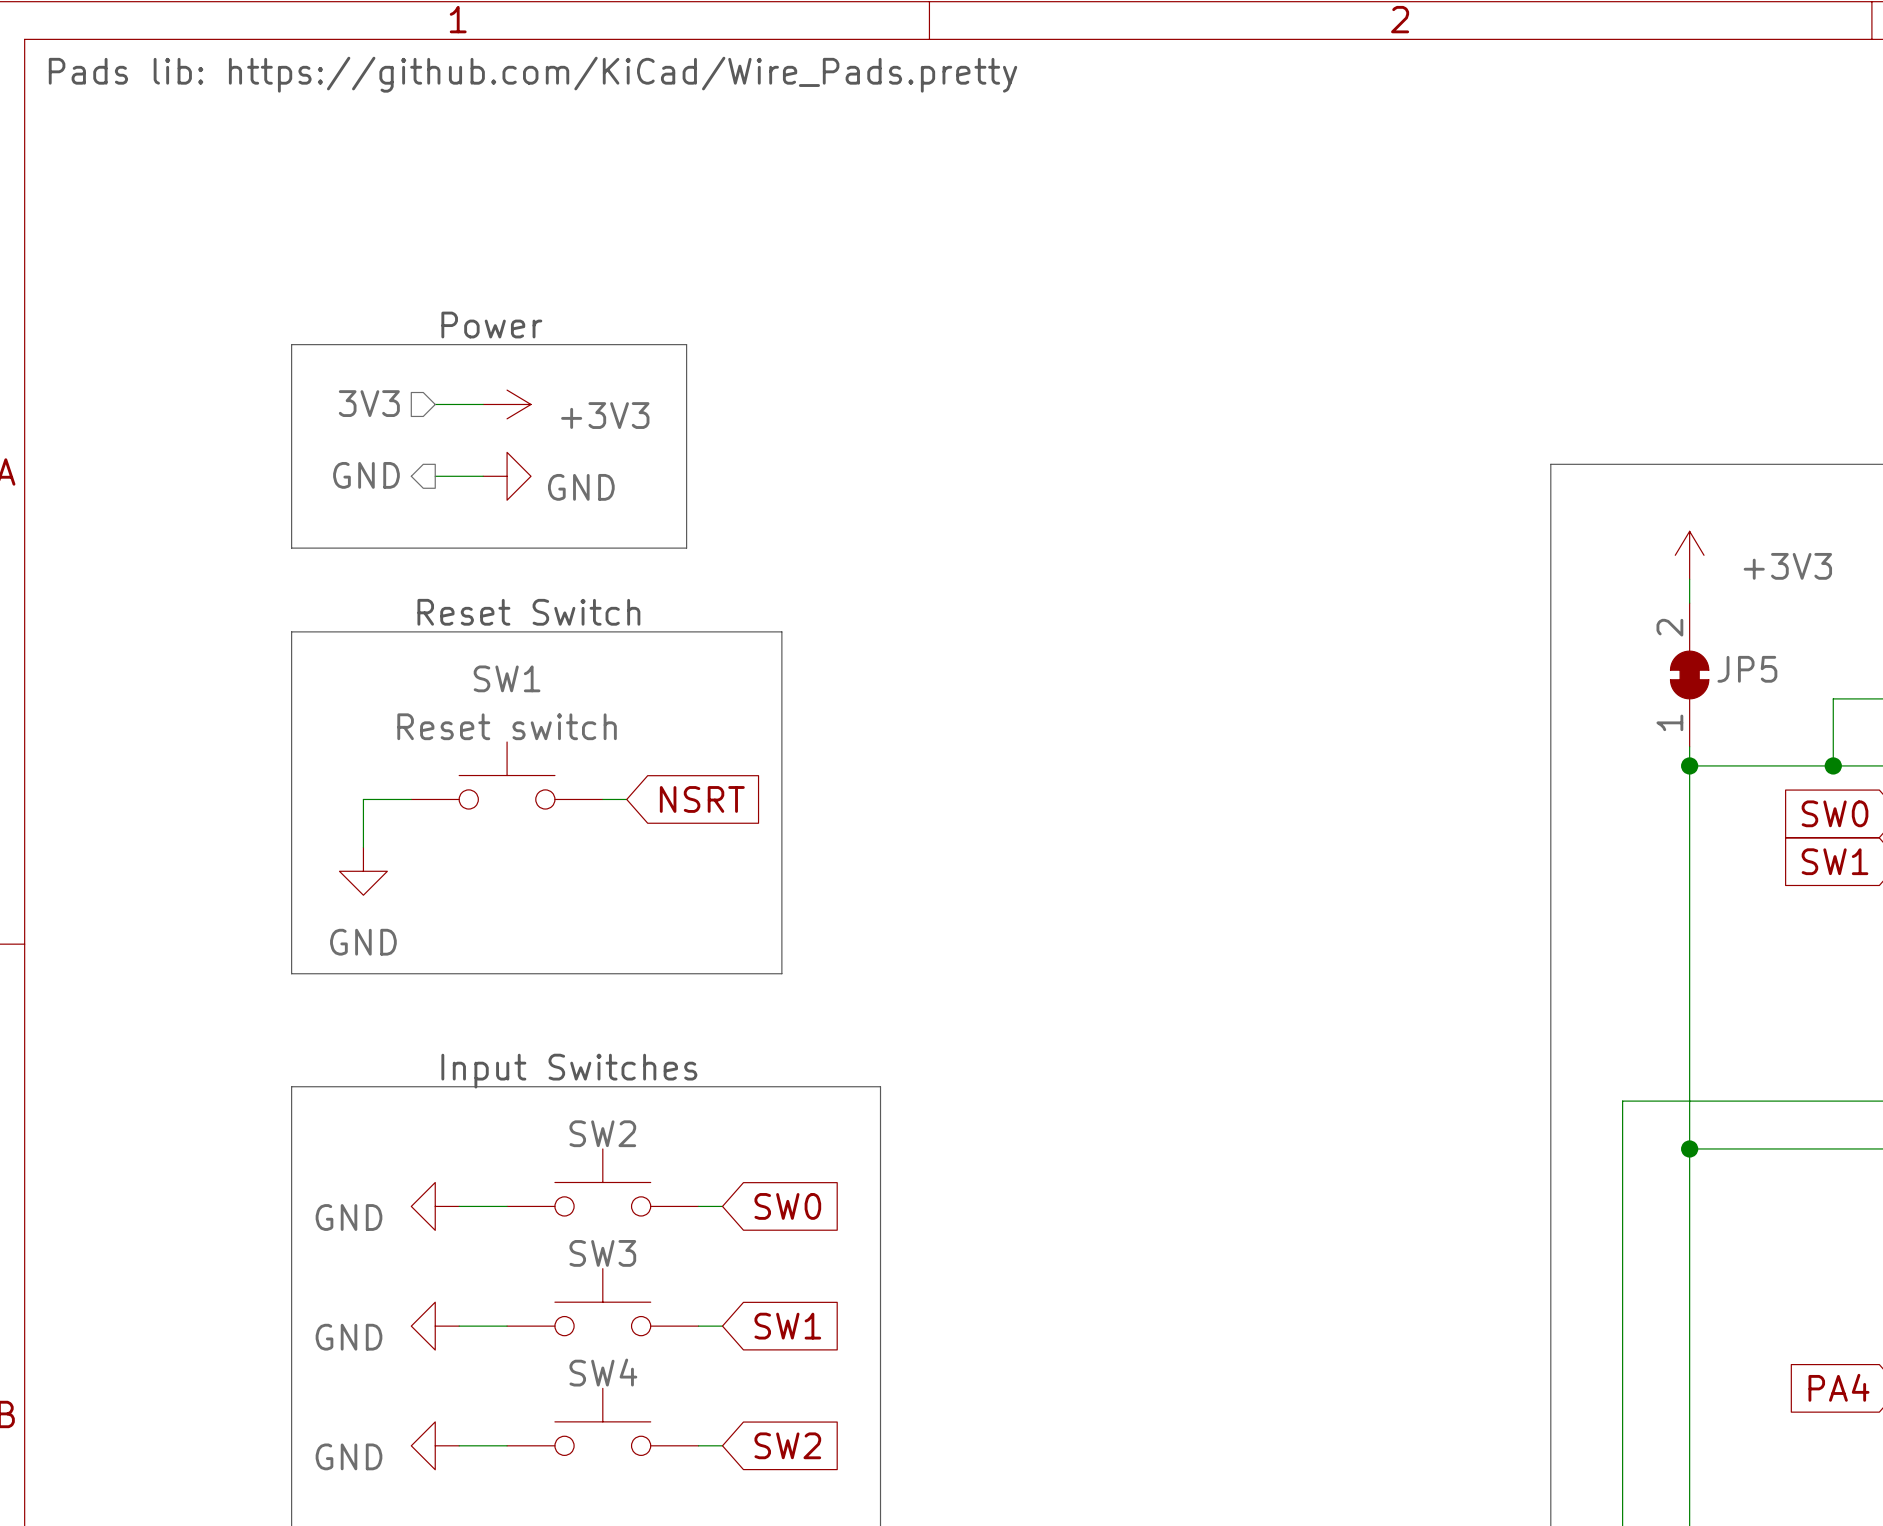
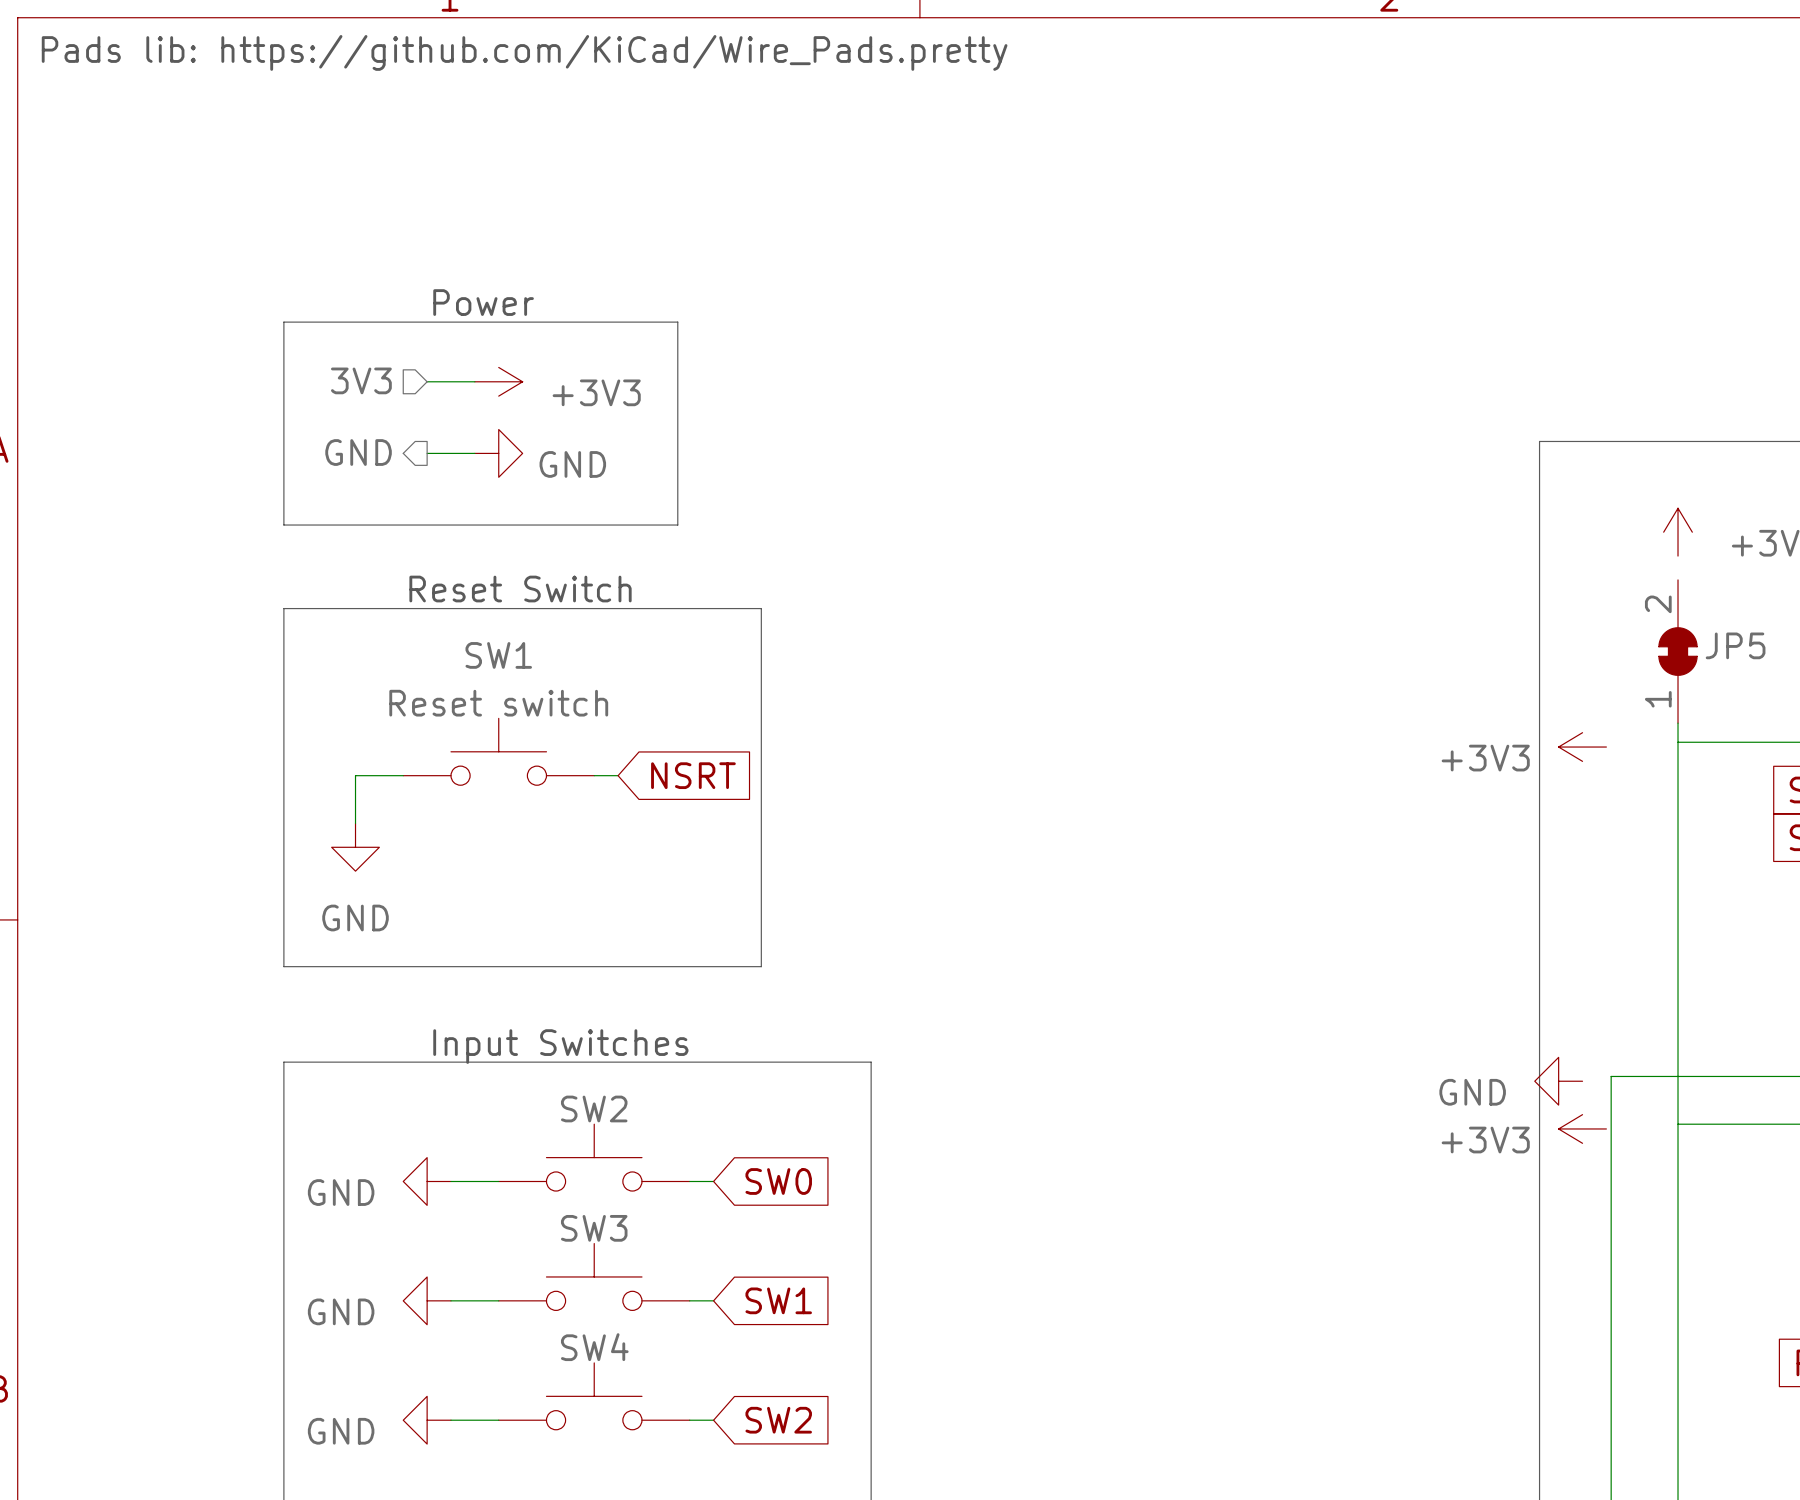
wire: (1689, 579) (1689, 603) -> none
line: (770, 631) (781, 631) (781, 973) (291, 973) -> (761, 608) (761, 966) (283, 966) (283, 949)
junction: (1689, 765) -> none
power symbol: none -> +3V3 (1582, 747)
power symbol: none -> GND (1558, 1081)
junction: (1689, 1148) -> none
power symbol: none -> +3V3 (1582, 1128)

